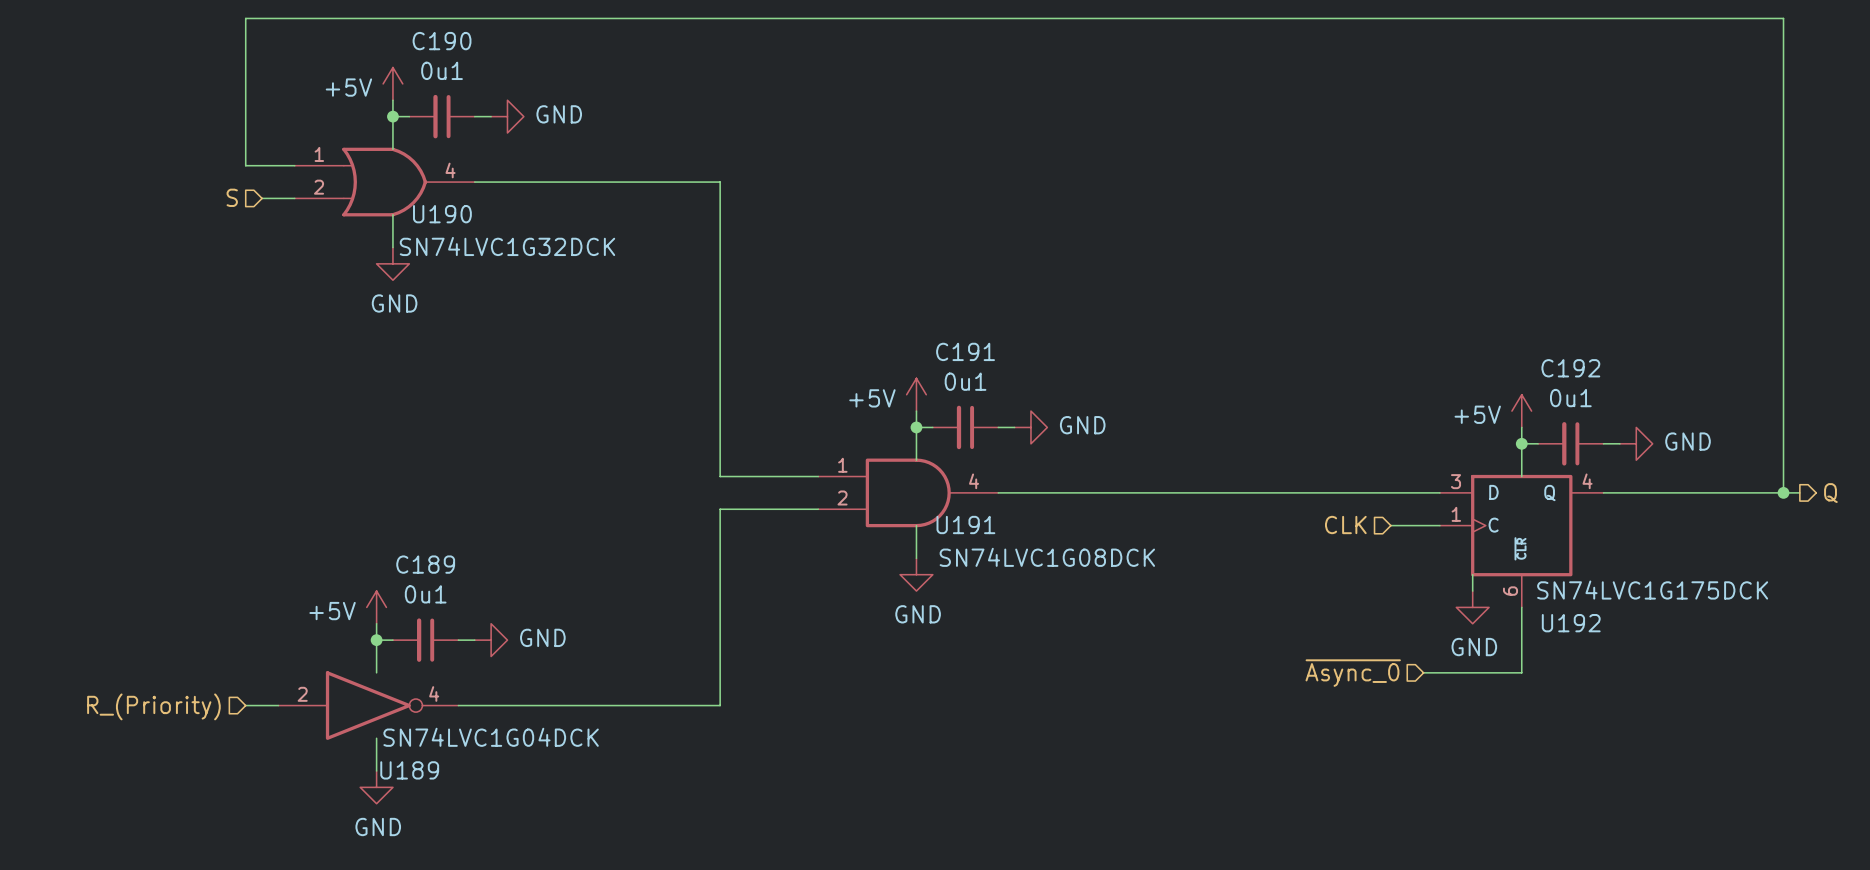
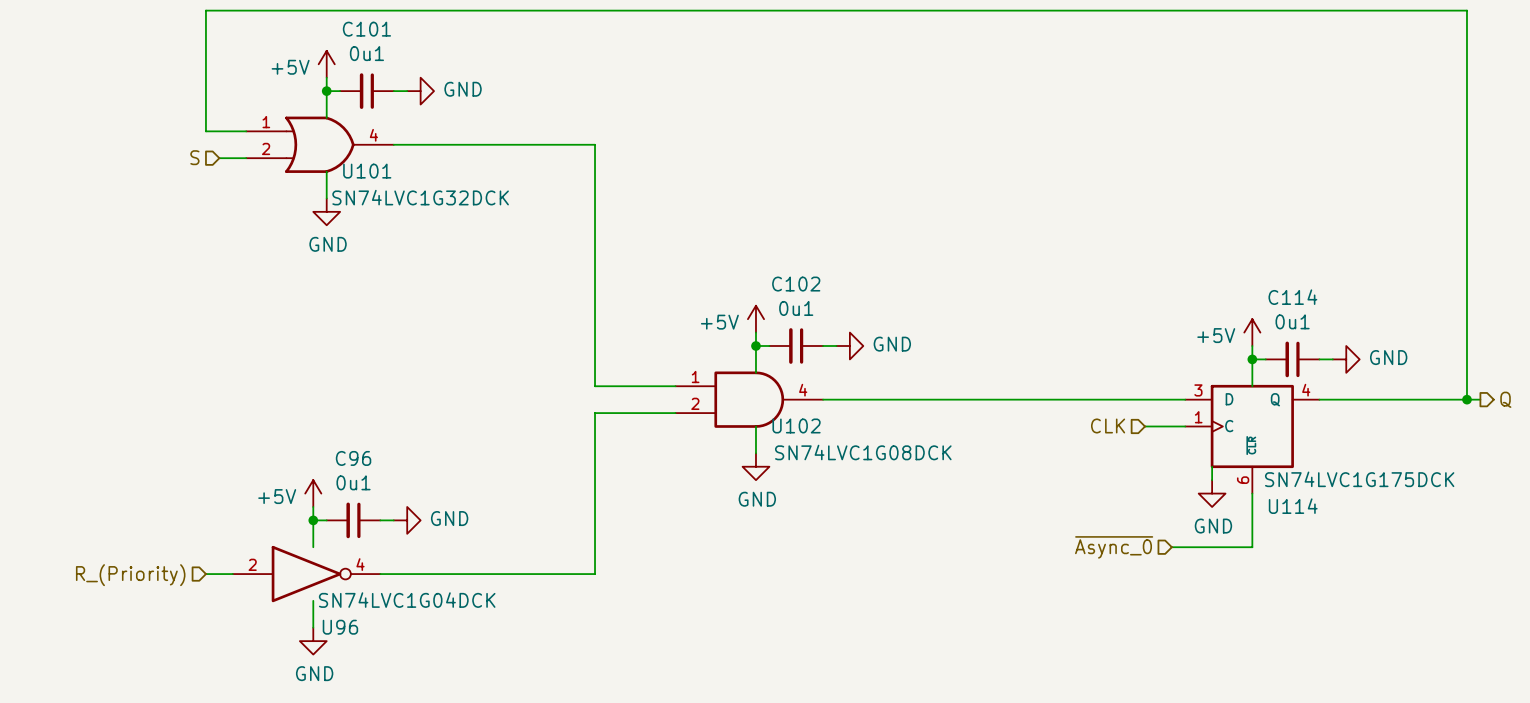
C190 name: C190 (442, 41) -> C101 (366, 29)
U190 name: U190 (442, 214) -> U101 (367, 171)
C191 name: C191 (965, 351) -> C102 (796, 284)
C192 name: C192 (1570, 368) -> C114 (1292, 297)
U191 name: U191 (965, 525) -> U102 (796, 425)
C189 name: C189 (425, 564) -> C96 (353, 458)
U192 name: U192 (1571, 623) -> U114 (1293, 506)
U189 name: U189 (409, 770) -> U96 (340, 627)

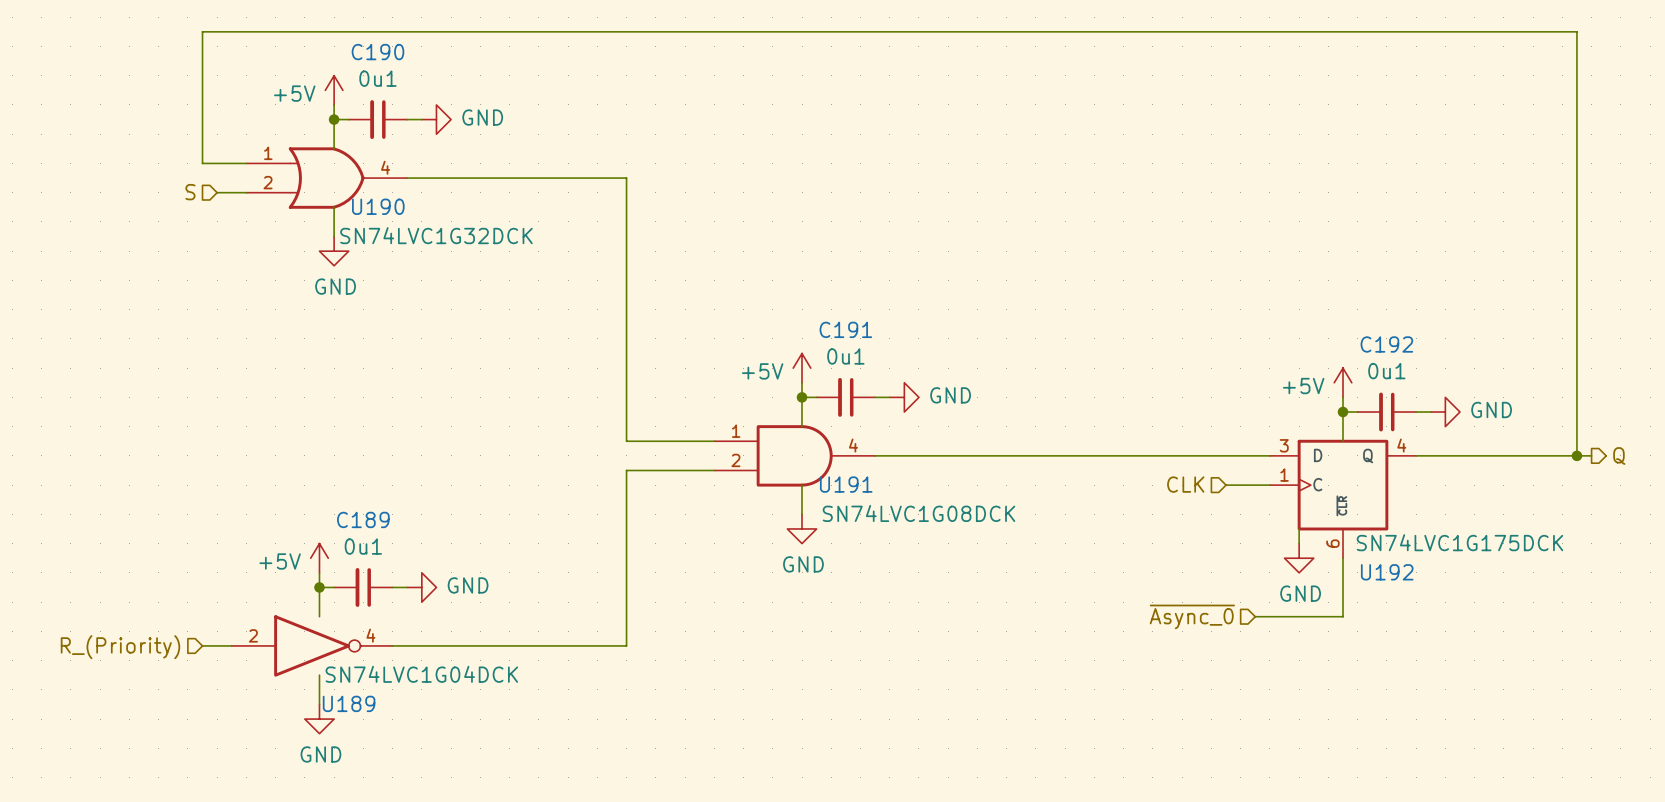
C101 name: C101 (366, 29) -> C190 (377, 52)
U101 name: U101 (367, 171) -> U190 (378, 206)
C102 name: C102 (796, 284) -> C191 (845, 329)
C114 name: C114 (1292, 297) -> C192 (1386, 344)
U102 name: U102 (796, 425) -> U191 (846, 484)
C96 name: C96 (353, 458) -> C189 (363, 519)
U114 name: U114 (1293, 506) -> U192 (1387, 572)
U96 name: U96 (340, 627) -> U189 (349, 703)

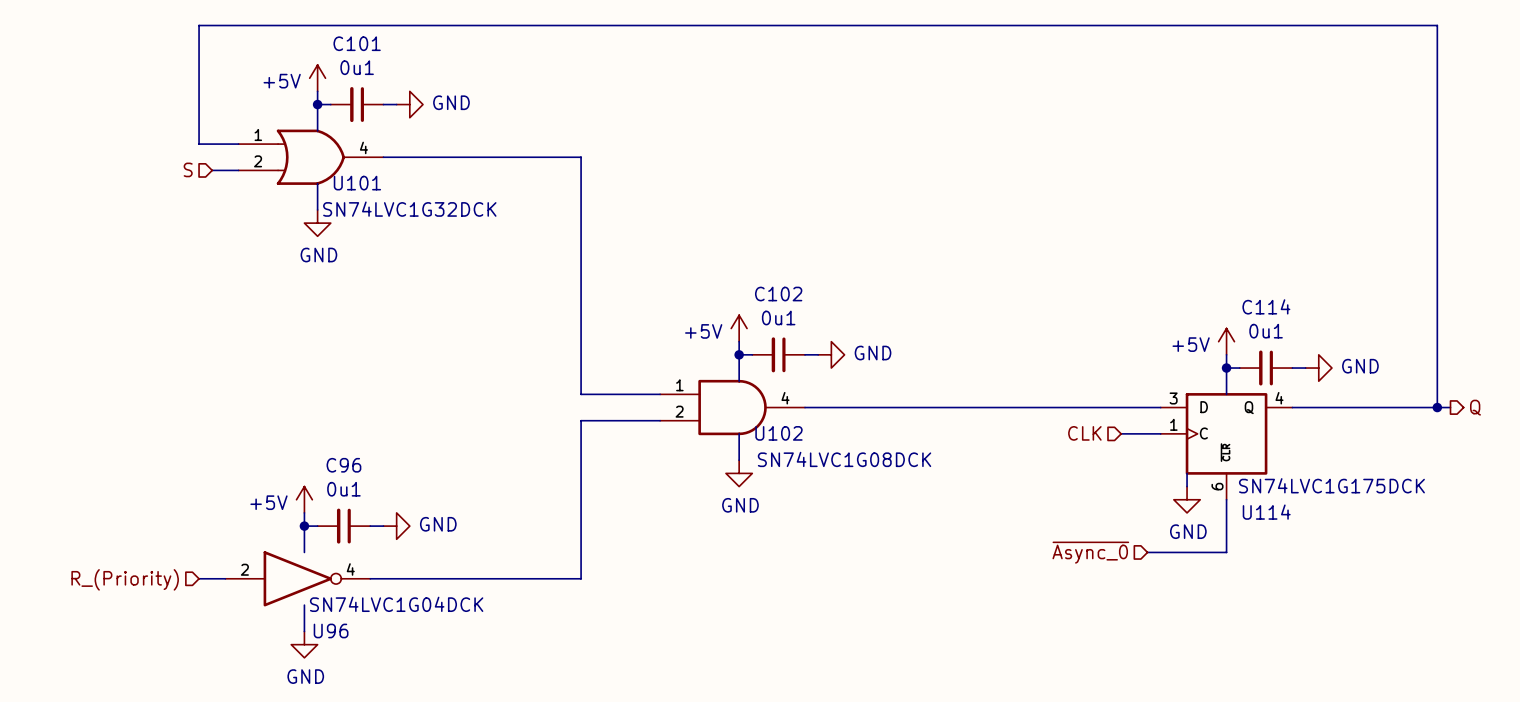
C190 name: C190 (377, 52) -> C101 (357, 43)
U190 name: U190 (378, 206) -> U101 (357, 183)
C191 name: C191 (845, 329) -> C102 (778, 294)
C192 name: C192 (1386, 344) -> C114 (1266, 306)
U191 name: U191 (846, 484) -> U102 (778, 433)
C189 name: C189 (363, 519) -> C96 (343, 465)
U192 name: U192 (1387, 572) -> U114 (1266, 512)
U189 name: U189 (349, 703) -> U96 (331, 630)

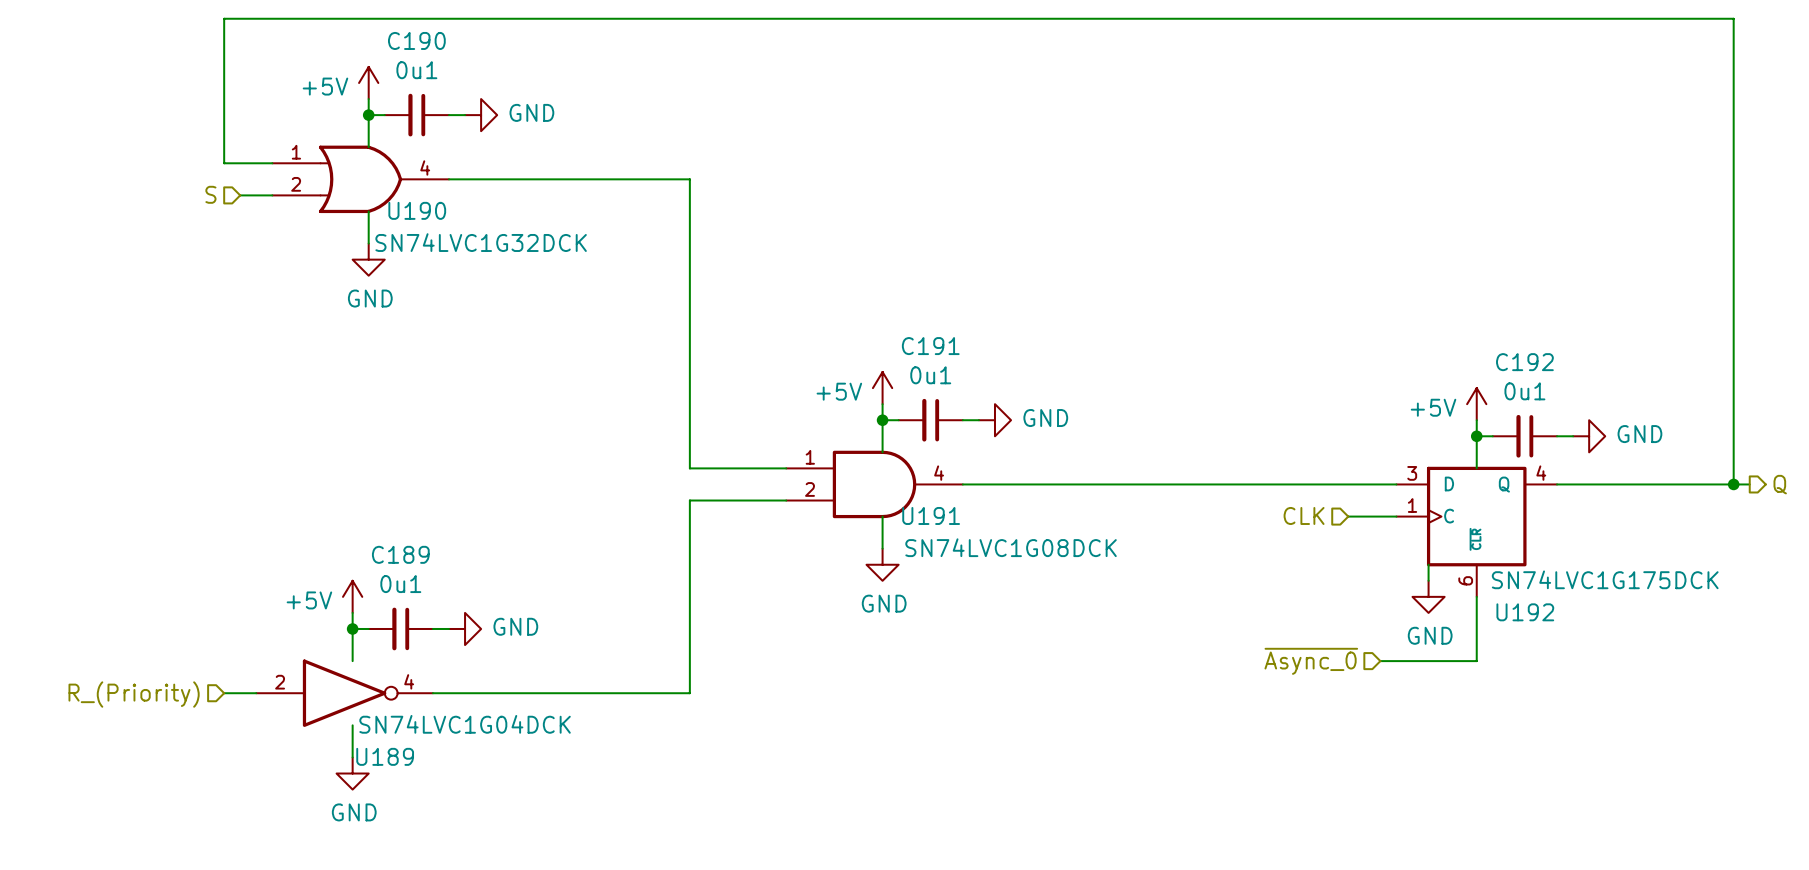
C101 name: C101 (357, 43) -> C190 (416, 40)
U101 name: U101 (357, 183) -> U190 (417, 210)
C102 name: C102 (778, 294) -> C191 (930, 346)
C114 name: C114 (1266, 306) -> C192 (1524, 362)
U102 name: U102 (778, 433) -> U191 (931, 515)
C96 name: C96 (343, 465) -> C189 (400, 554)
U114 name: U114 (1266, 512) -> U192 (1525, 612)
U96 name: U96 (331, 630) -> U189 (385, 756)

